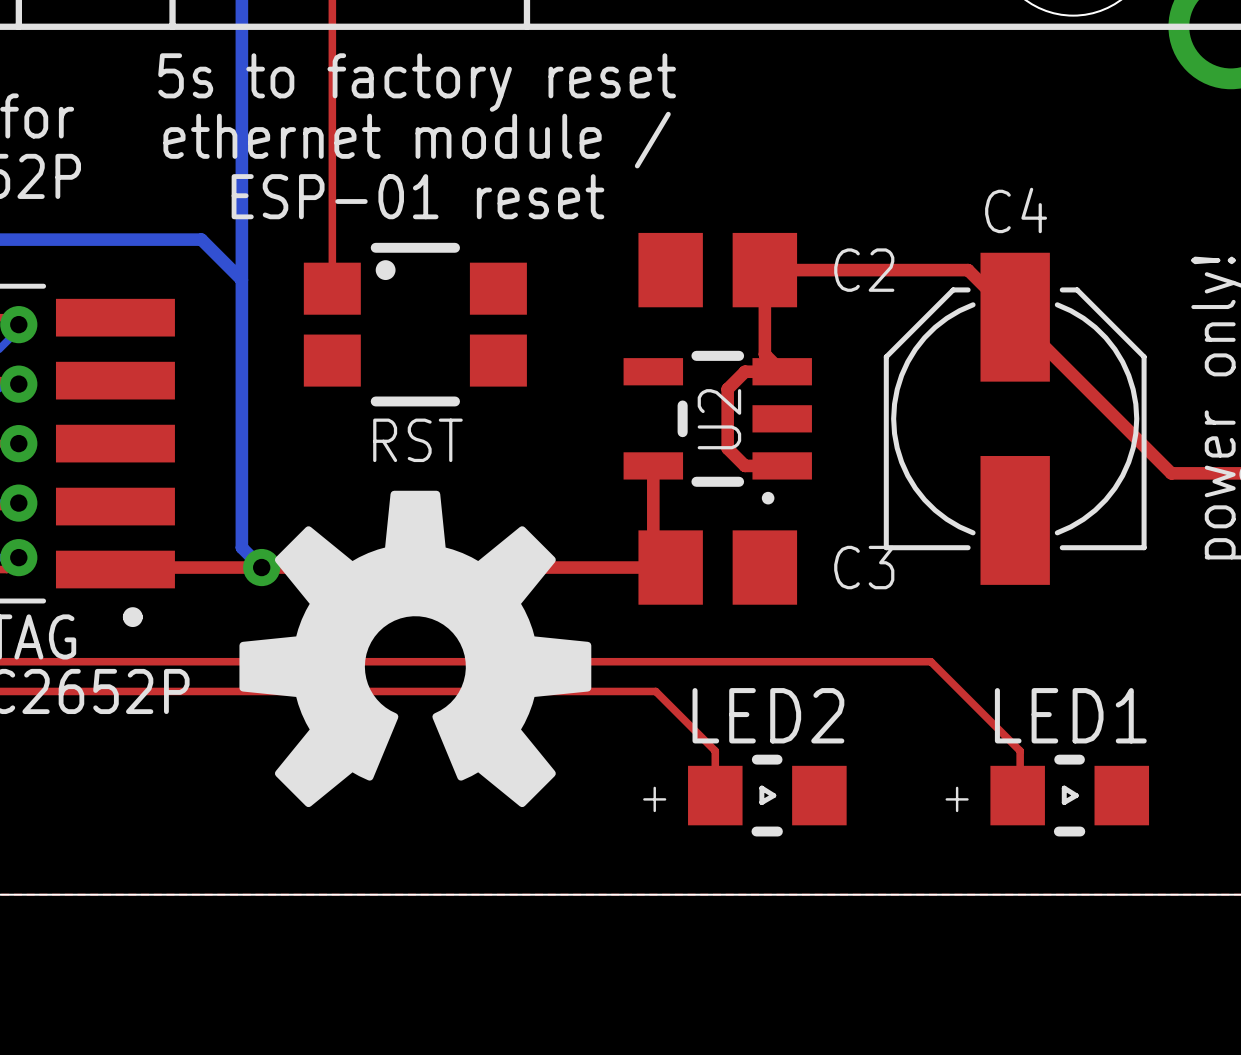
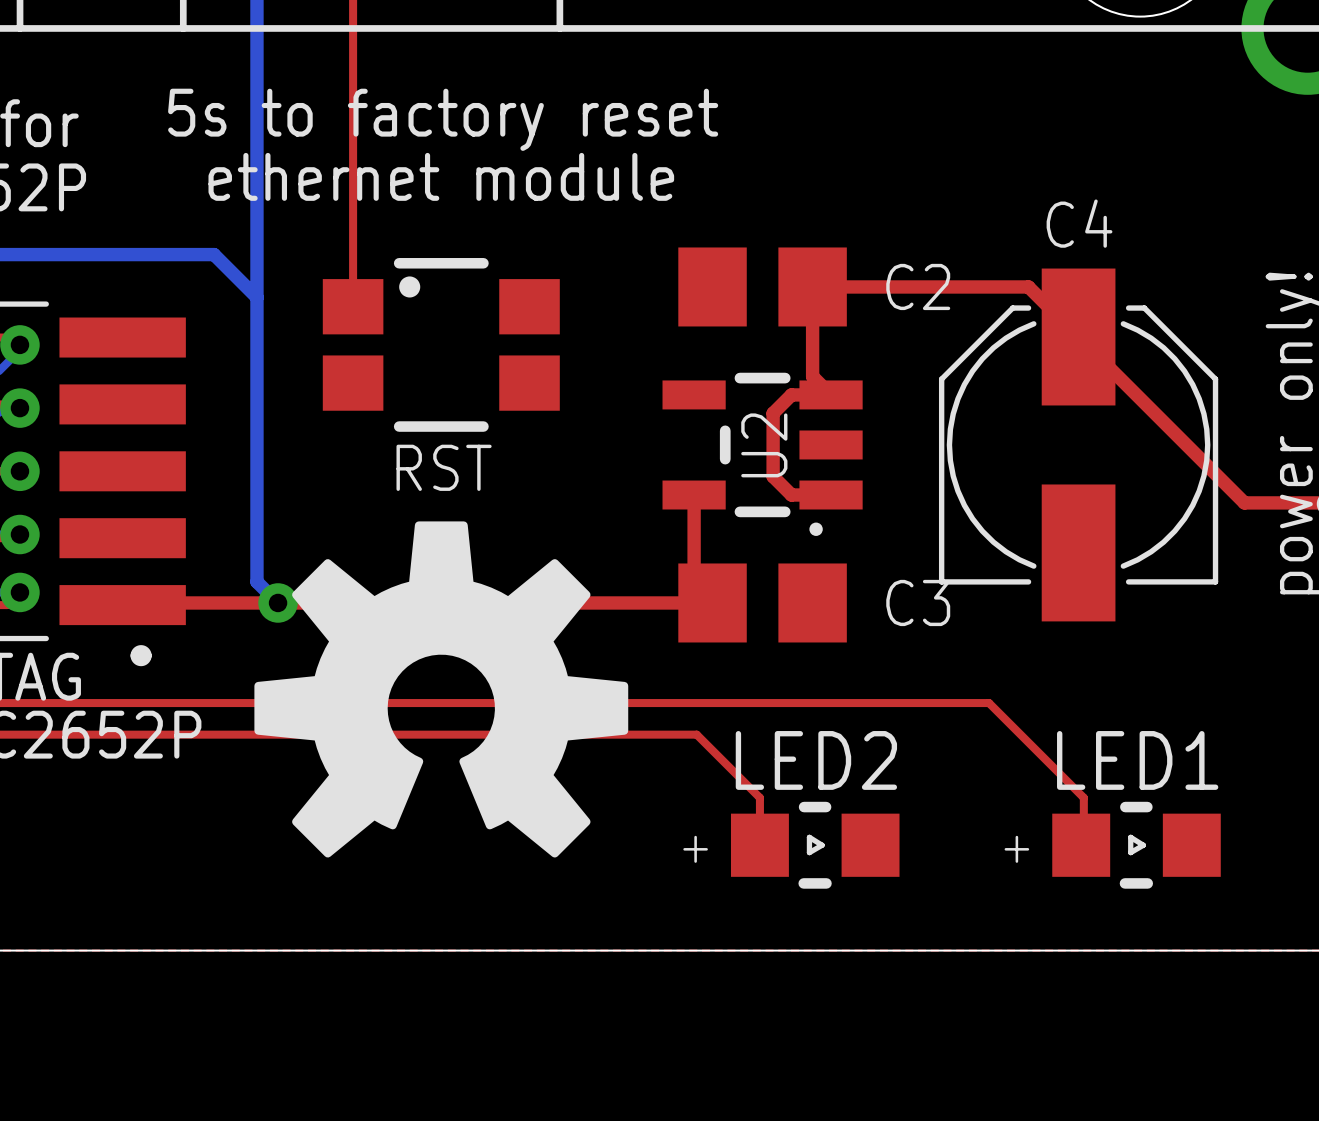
text position: 5s to factory reset (417, 82) -> 5s to factory reset (443, 119)
text: ethernet module / (417, 140) -> ethernet module (441, 176)
text: ESP-01 reset (417, 196) -> none

